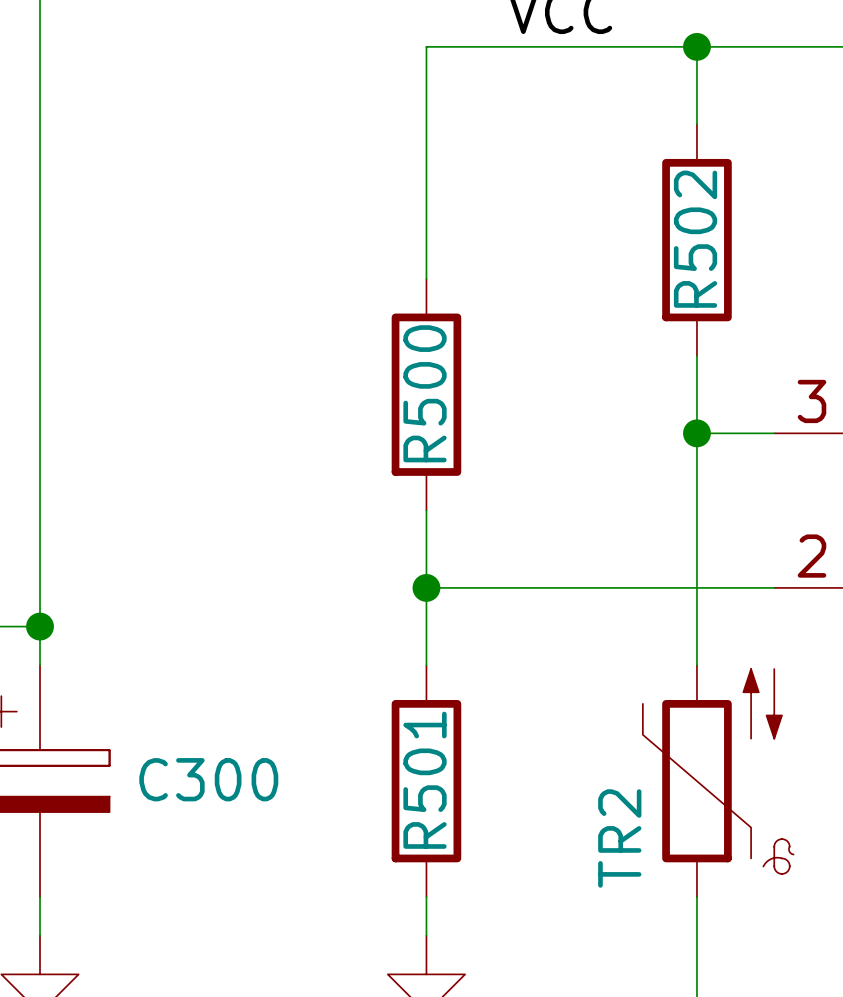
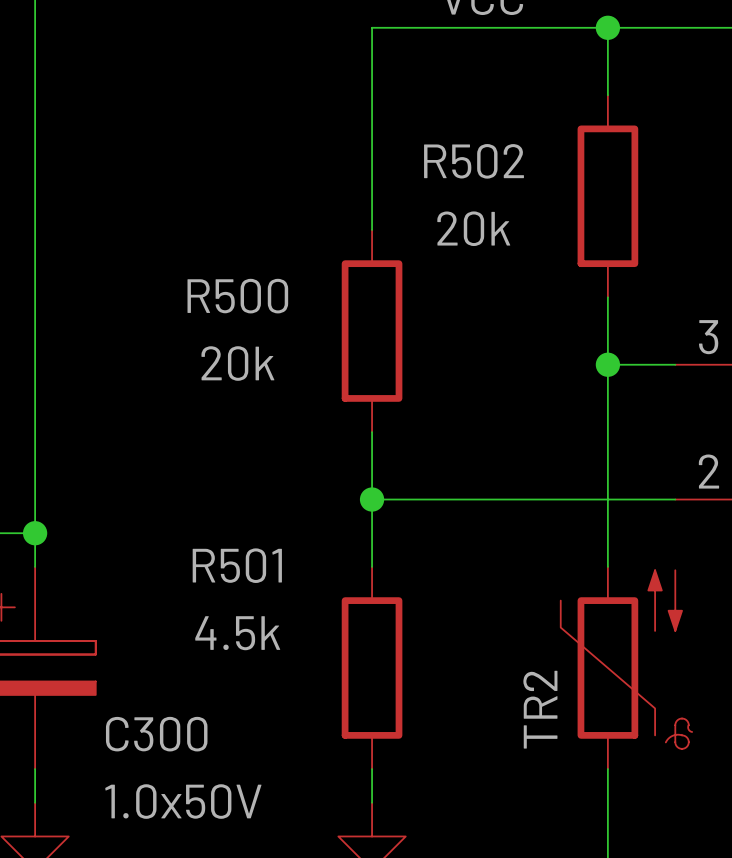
R502 name rotation: 0° (695, 239) -> 90° clockwise (474, 161)
R502 value: none -> 20k (473, 228)
R500 name rotation: 0° (425, 393) -> 90° clockwise (237, 296)
R500 value: none -> 20k (237, 363)
R501 value: none -> 4.5k (237, 633)
C300 name position: C300 (208, 779) -> C300 (156, 734)
R501 name rotation: 0° (425, 780) -> 90° clockwise (237, 565)
R501 name position: R501 (425, 780) -> R501 (237, 565)
C300 value: none -> 1.0x50V (183, 801)

